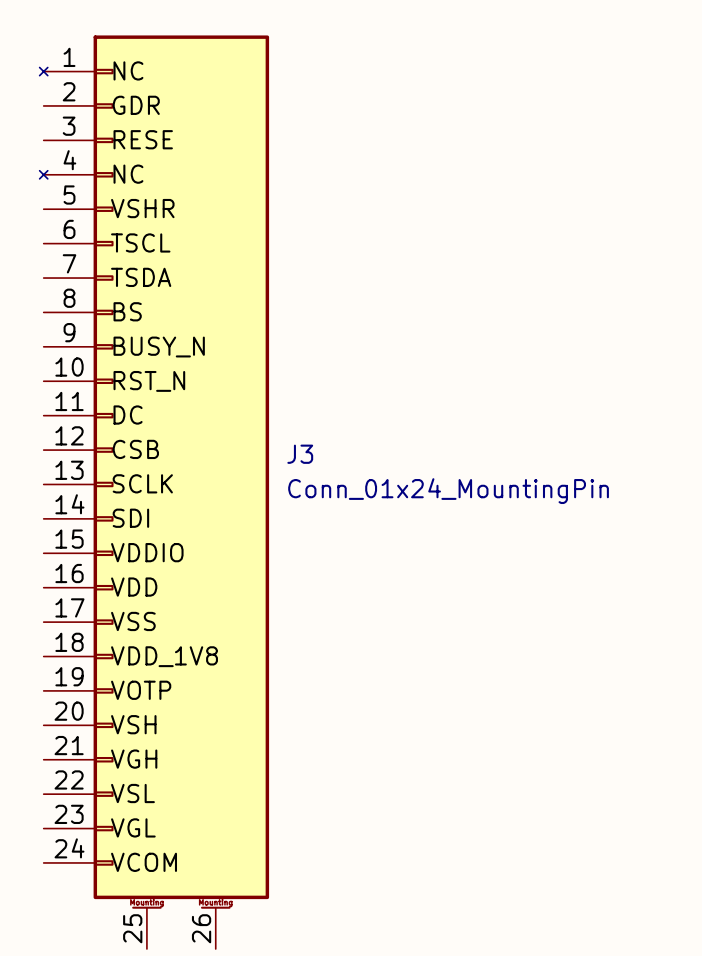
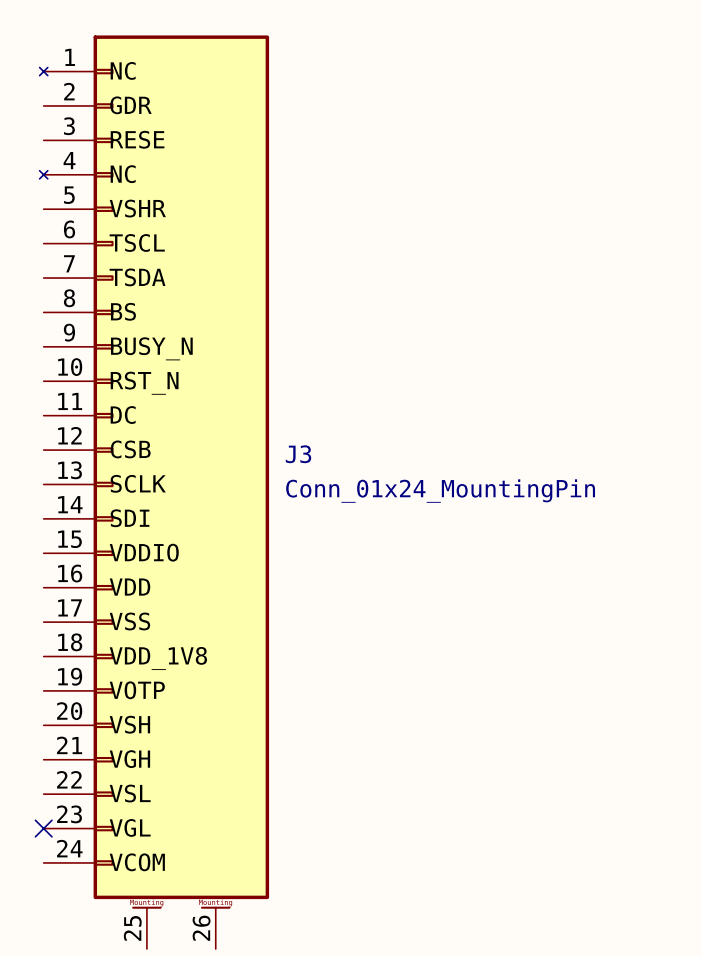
no-connect mark: none -> (43, 828)

